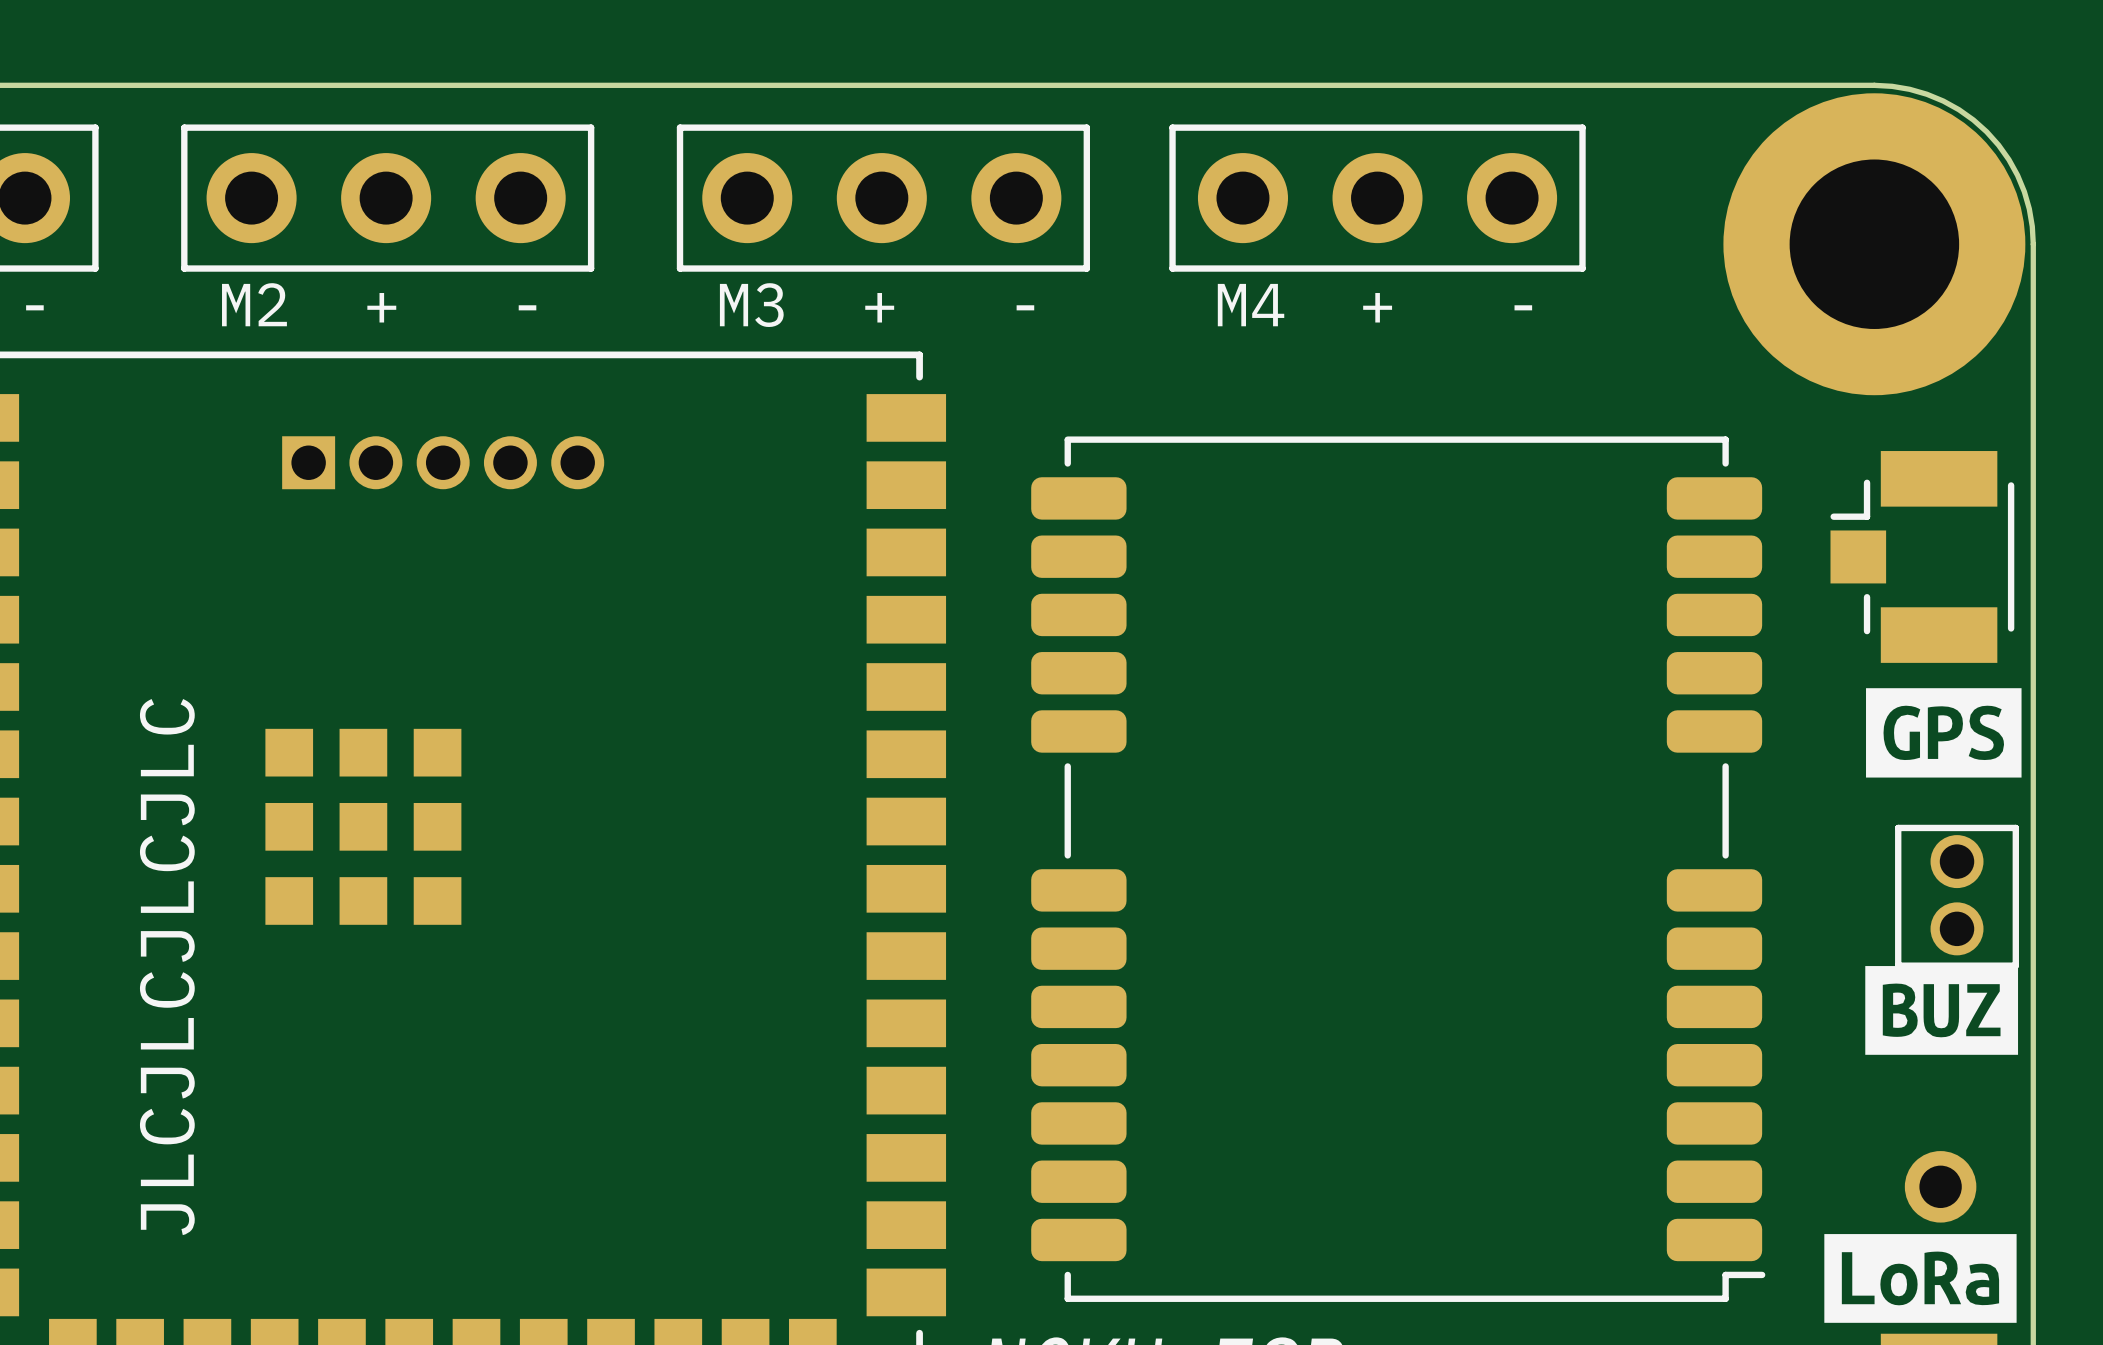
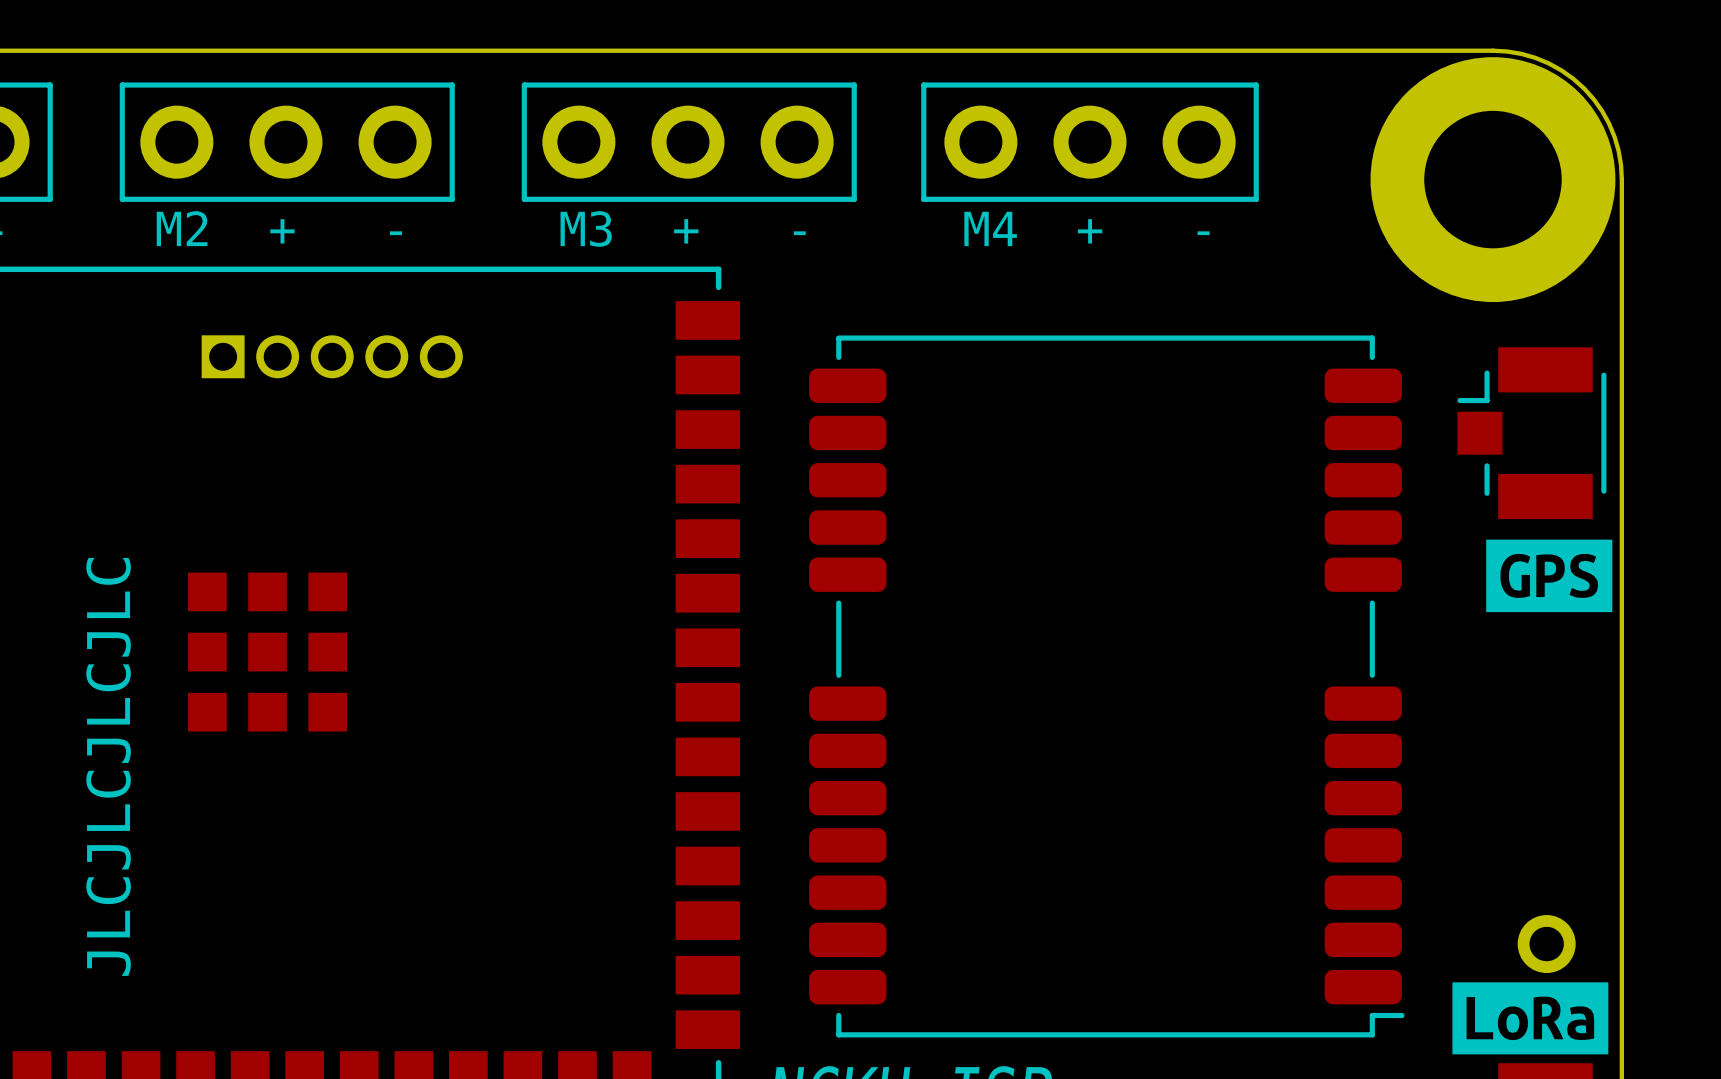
part: (1957, 896) -> none
drawing: [1865, 966, 2019, 1055] -> none

